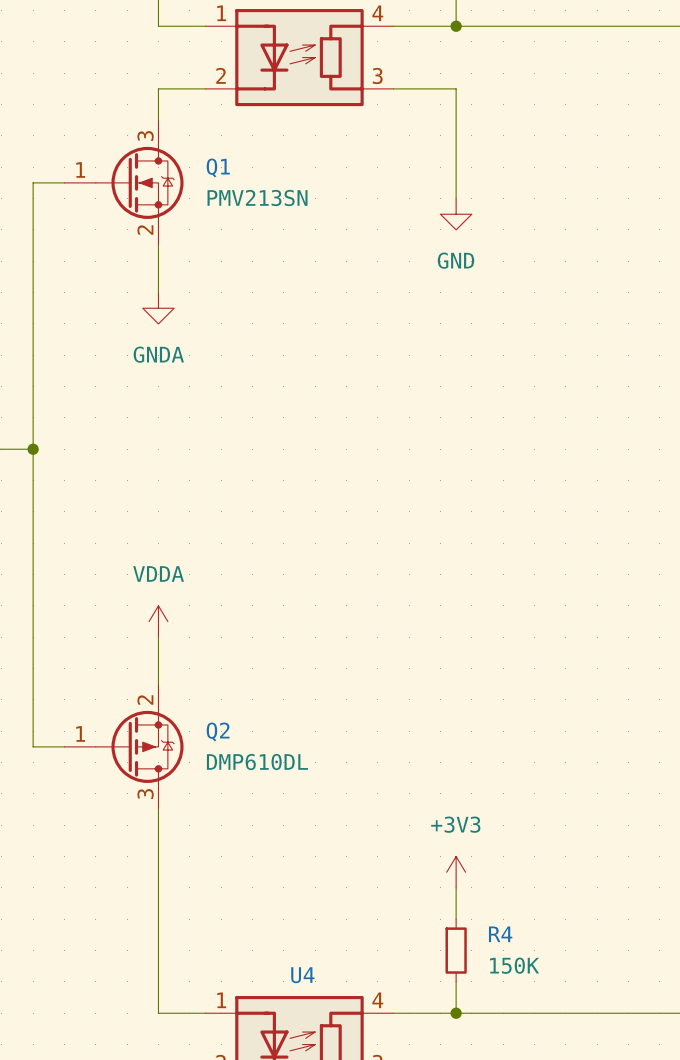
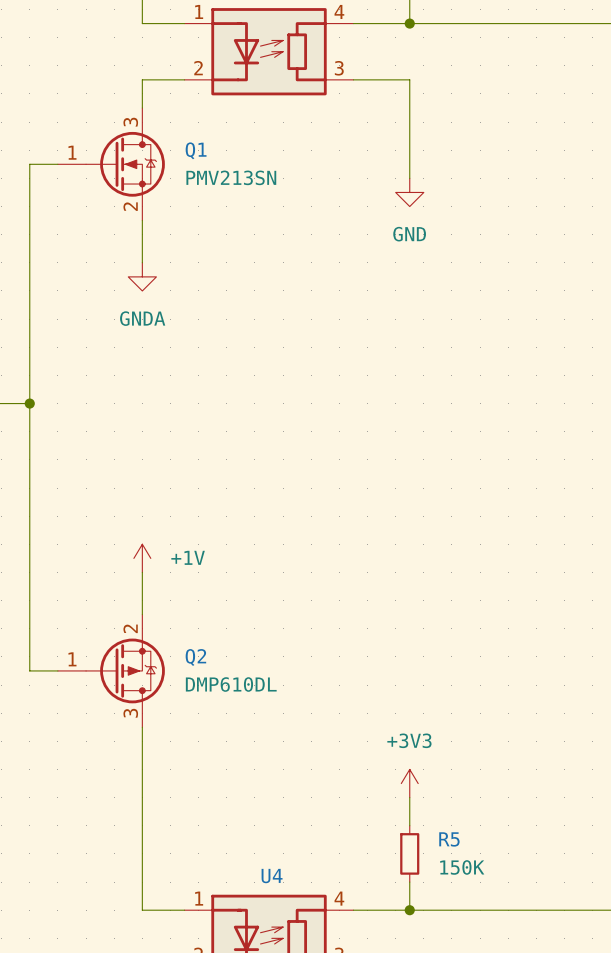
power symbol: VDDA (158, 621) -> +1V (142, 558)
R4 name: R4 (500, 934) -> R5 (449, 839)

